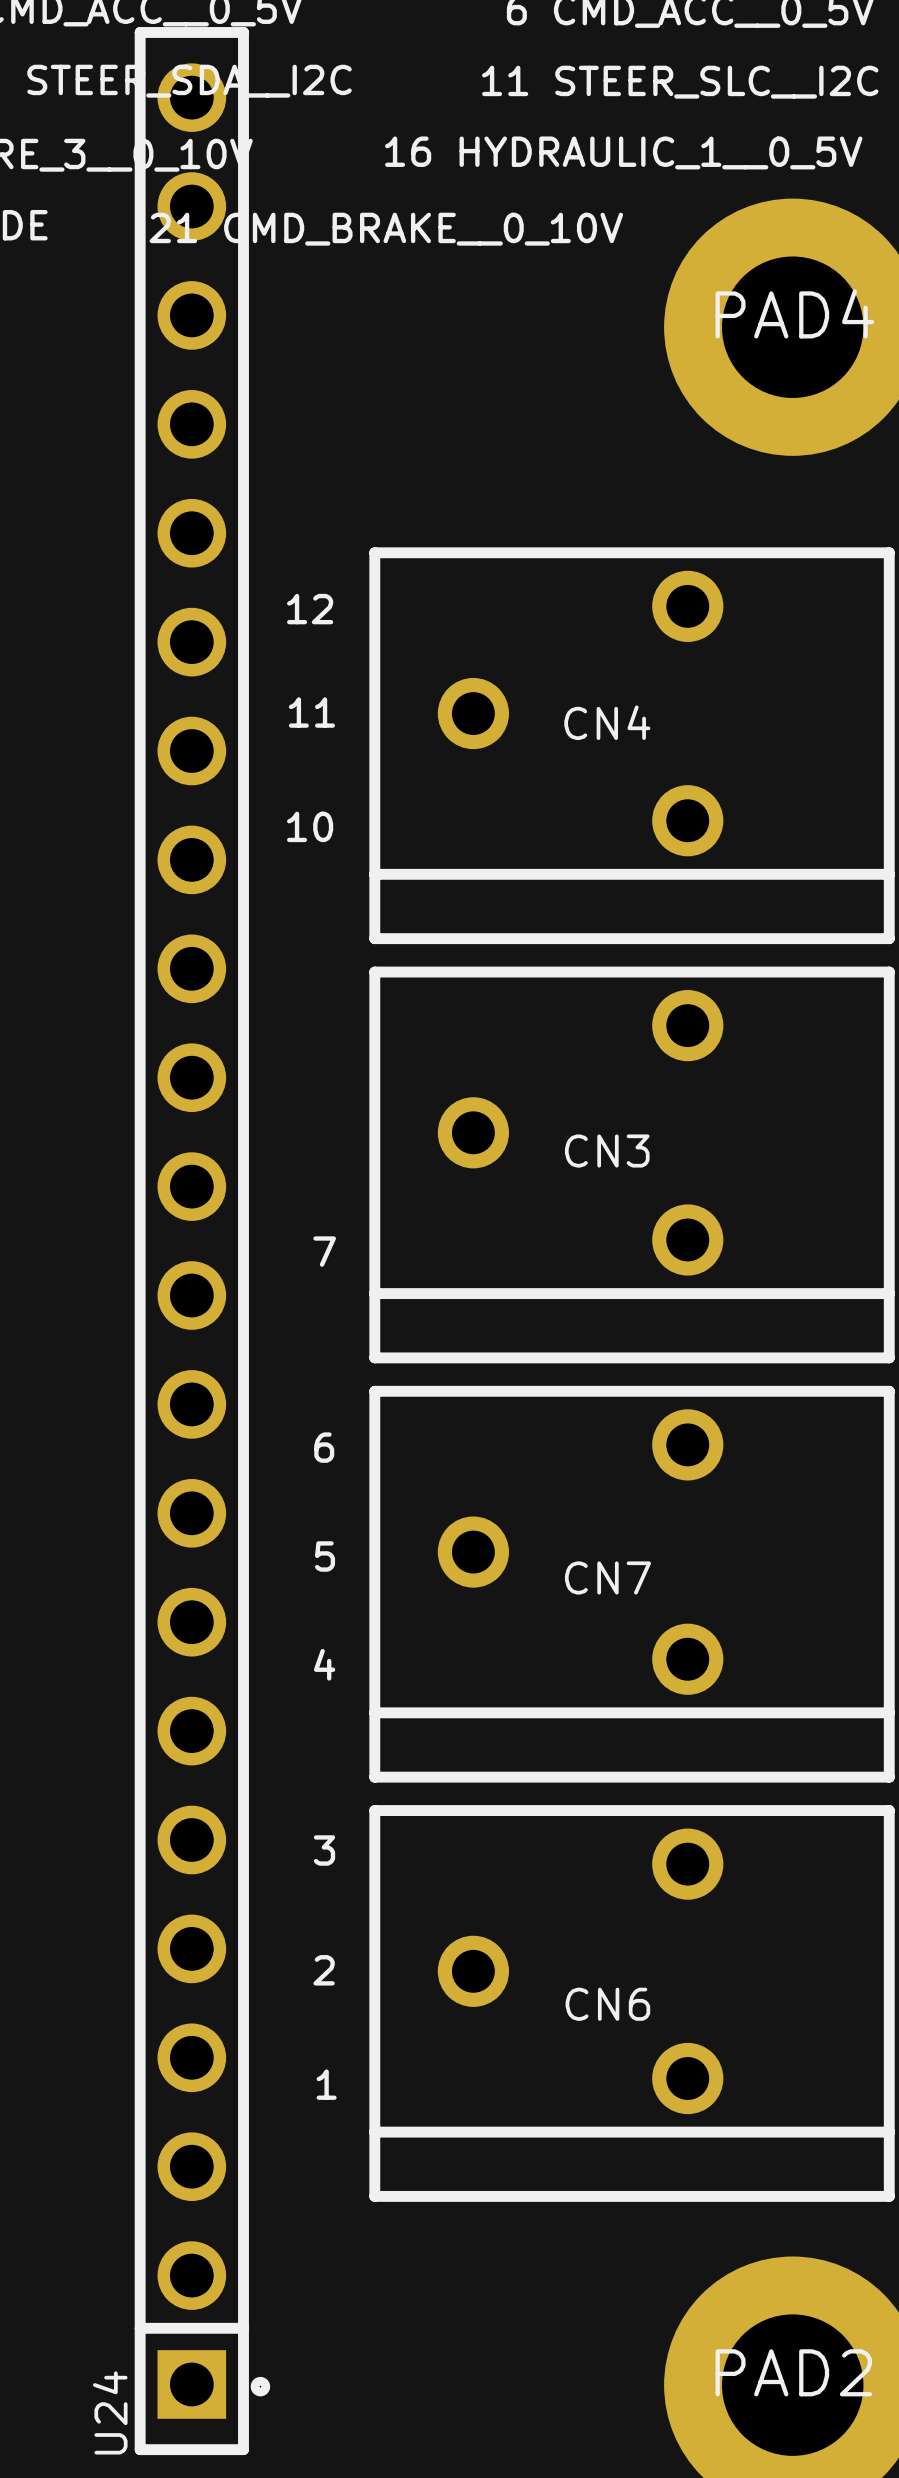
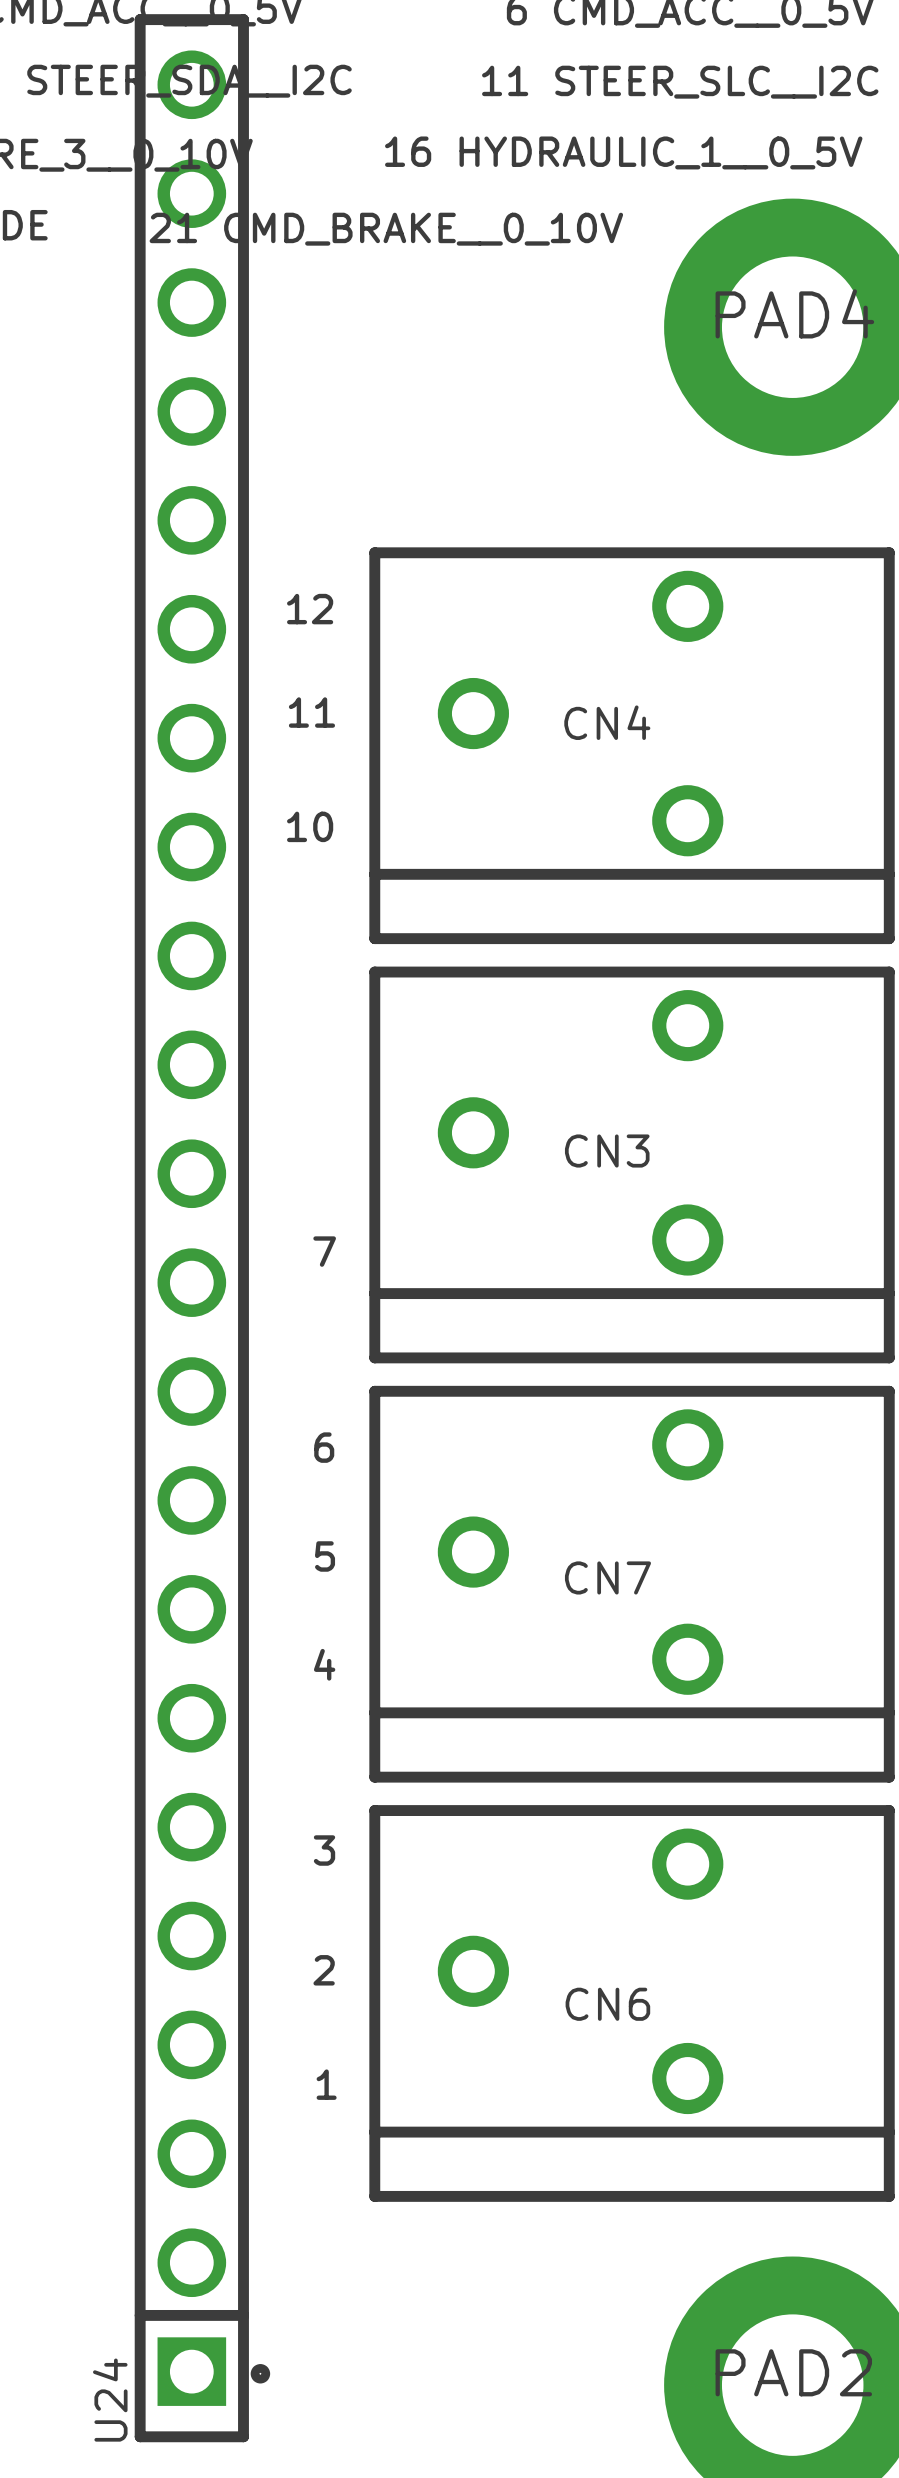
U24 position: (202, 1241) -> (202, 1228)

